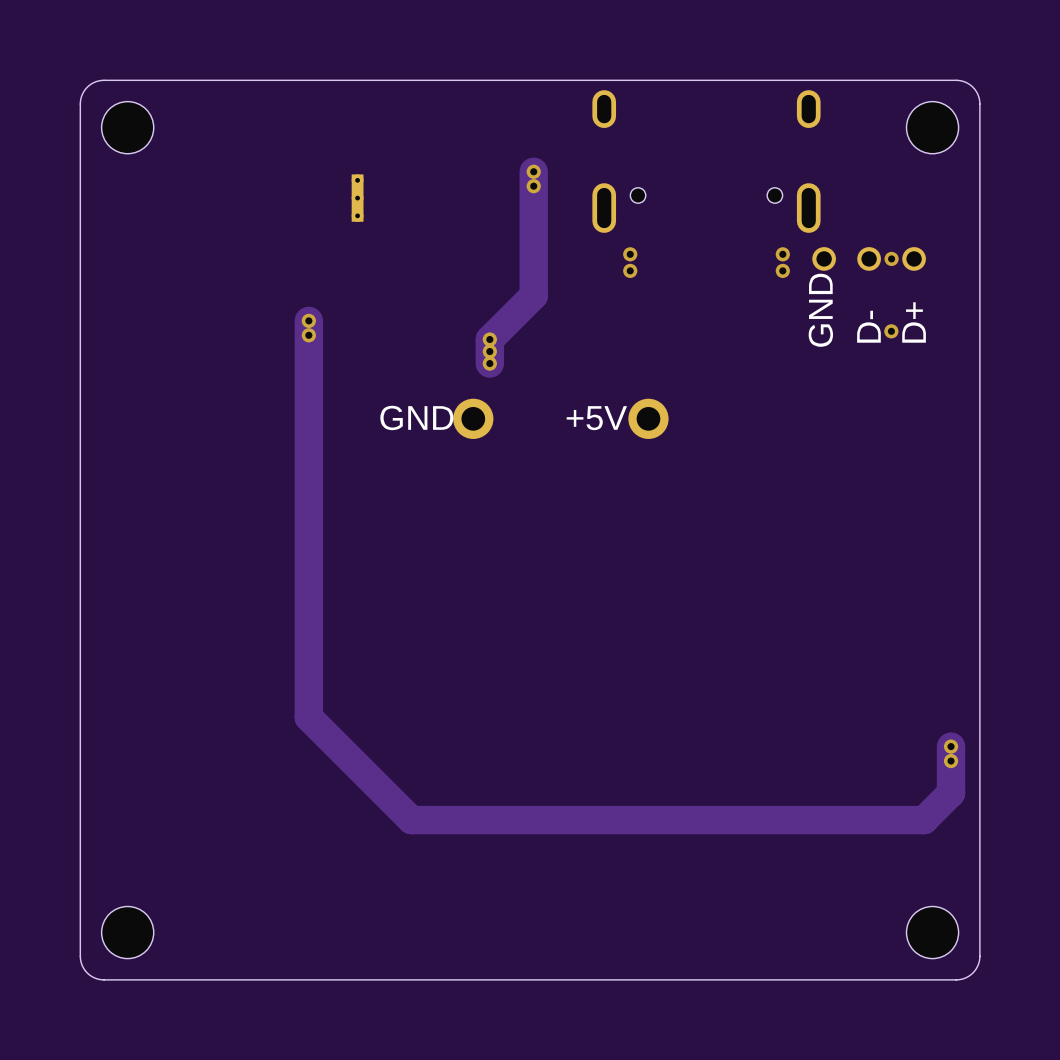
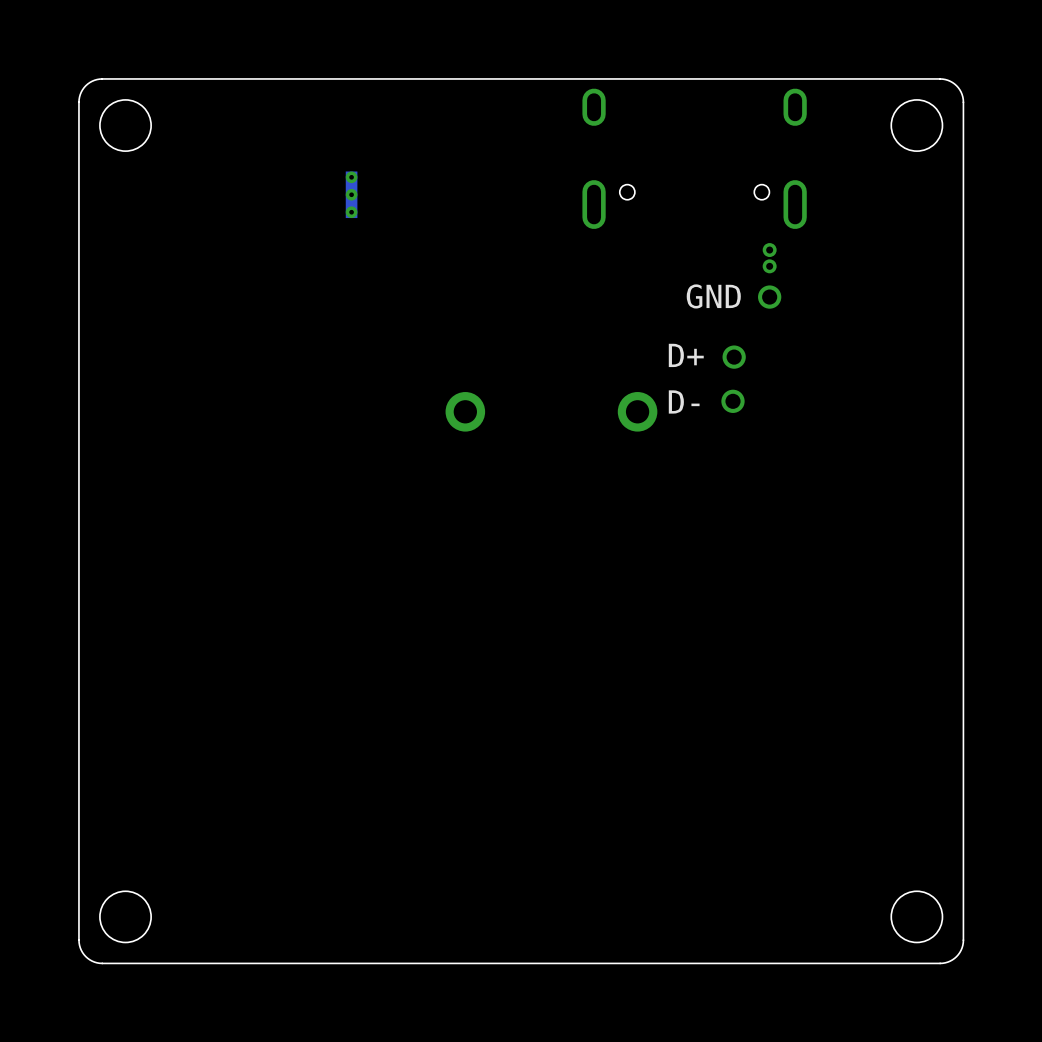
track: (533, 171) (533, 295) (489, 339) (489, 363) -> none
via: (533, 171) -> none
via: (533, 186) -> none
via: (630, 254) -> none
part: (824, 258) -> none
part: (869, 258) -> none
via: (891, 258) -> none
part: (914, 258) -> none
via: (630, 270) -> none
part: none -> (769, 297)
text rotation: 0° (820, 310) -> 90° clockwise (713, 296)
track: (308, 320) (308, 717) (411, 820) (924, 820) (951, 793) (951, 746) -> none
via: (308, 320) -> none
text rotation: 0° (914, 322) -> 90° clockwise (686, 355)
text position: D+ (914, 322) -> D+ (686, 355)
text rotation: 0° (868, 326) -> 90° clockwise (684, 401)
text position: D- (868, 326) -> D- (684, 401)
via: (891, 331) -> none
via: (308, 335) -> none
via: (489, 339) -> none
via: (489, 351) -> none
via: (489, 363) -> none
part: none -> (734, 357)
part: none -> (733, 401)
text: GND (416, 417) -> none
text: +5V (596, 418) -> none
via: (951, 746) -> none
via: (951, 761) -> none

